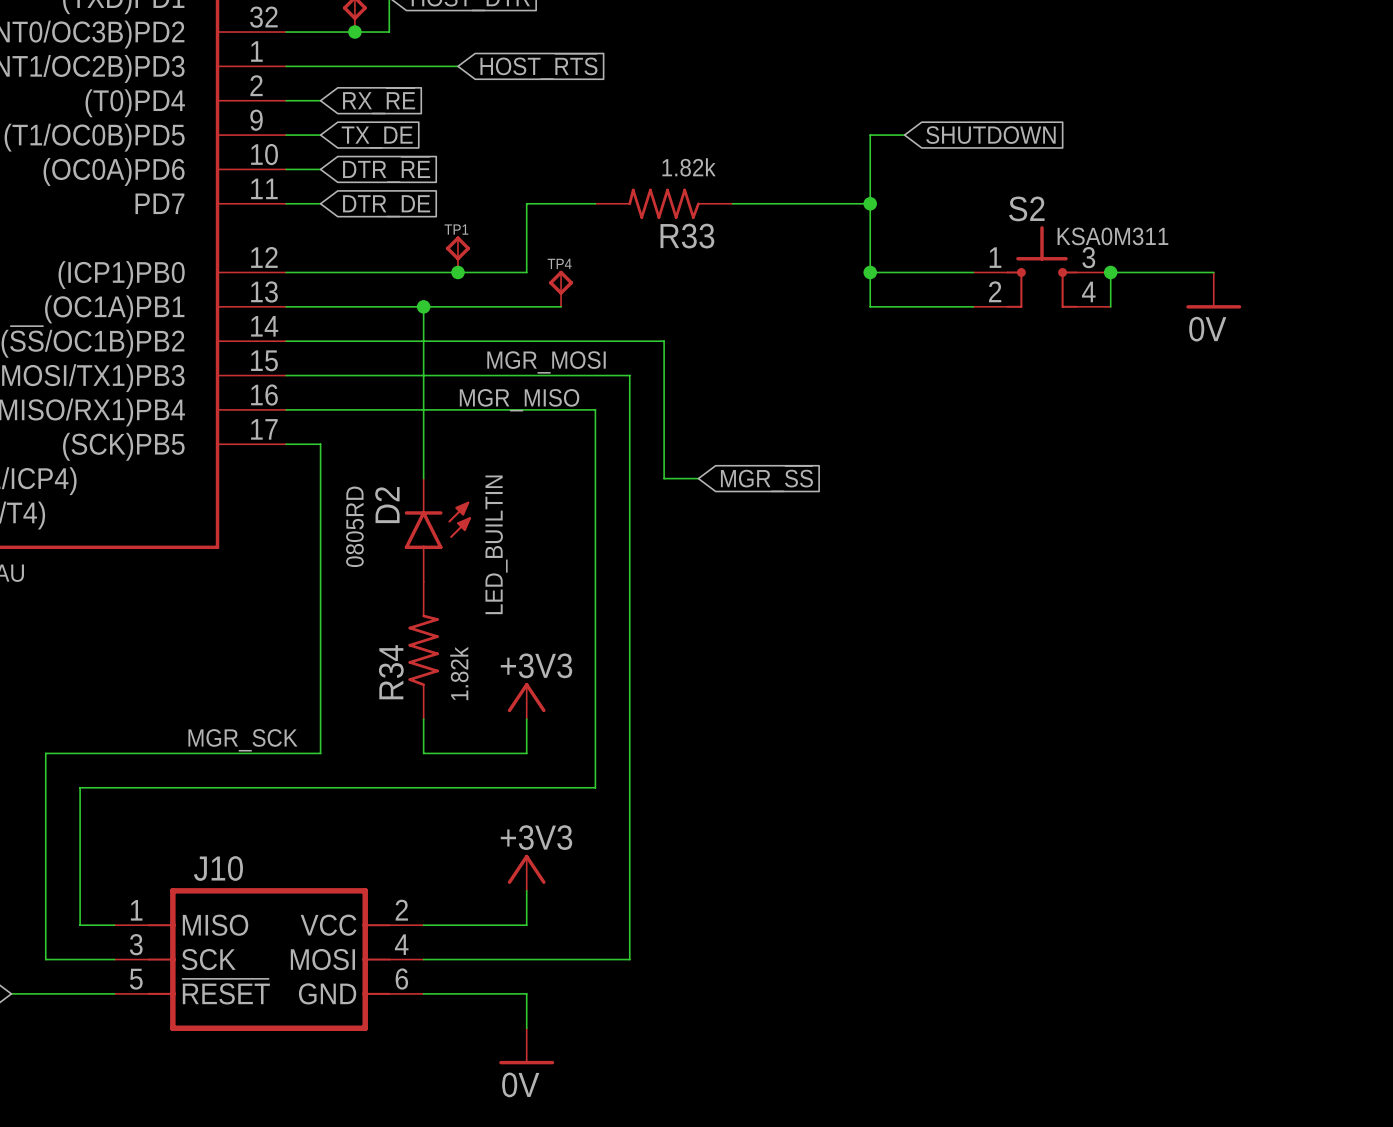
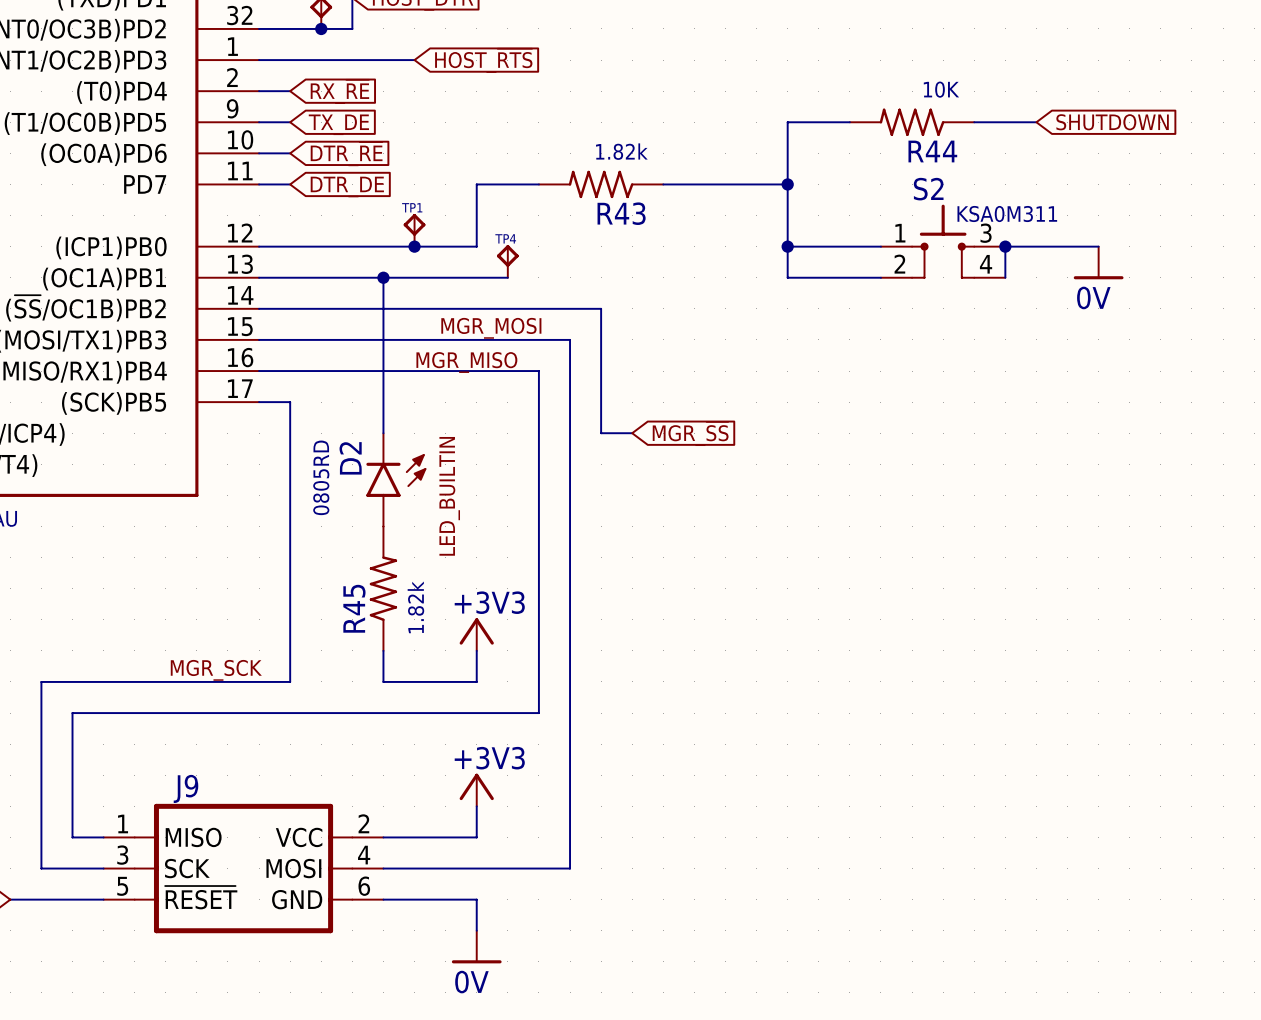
wire: none -> (818, 122) (849, 122)
global label position: SHUTDOWN (990, 135) -> SHUTDOWN (1112, 122)
R44: none -> 10K (912, 122)
wire: none -> (974, 122) (1036, 122)
R33 name: R33 (687, 236) -> R43 (621, 213)
R34 name: R34 (391, 672) -> R45 (354, 608)
J10 name: J10 (218, 868) -> J9 (185, 788)

